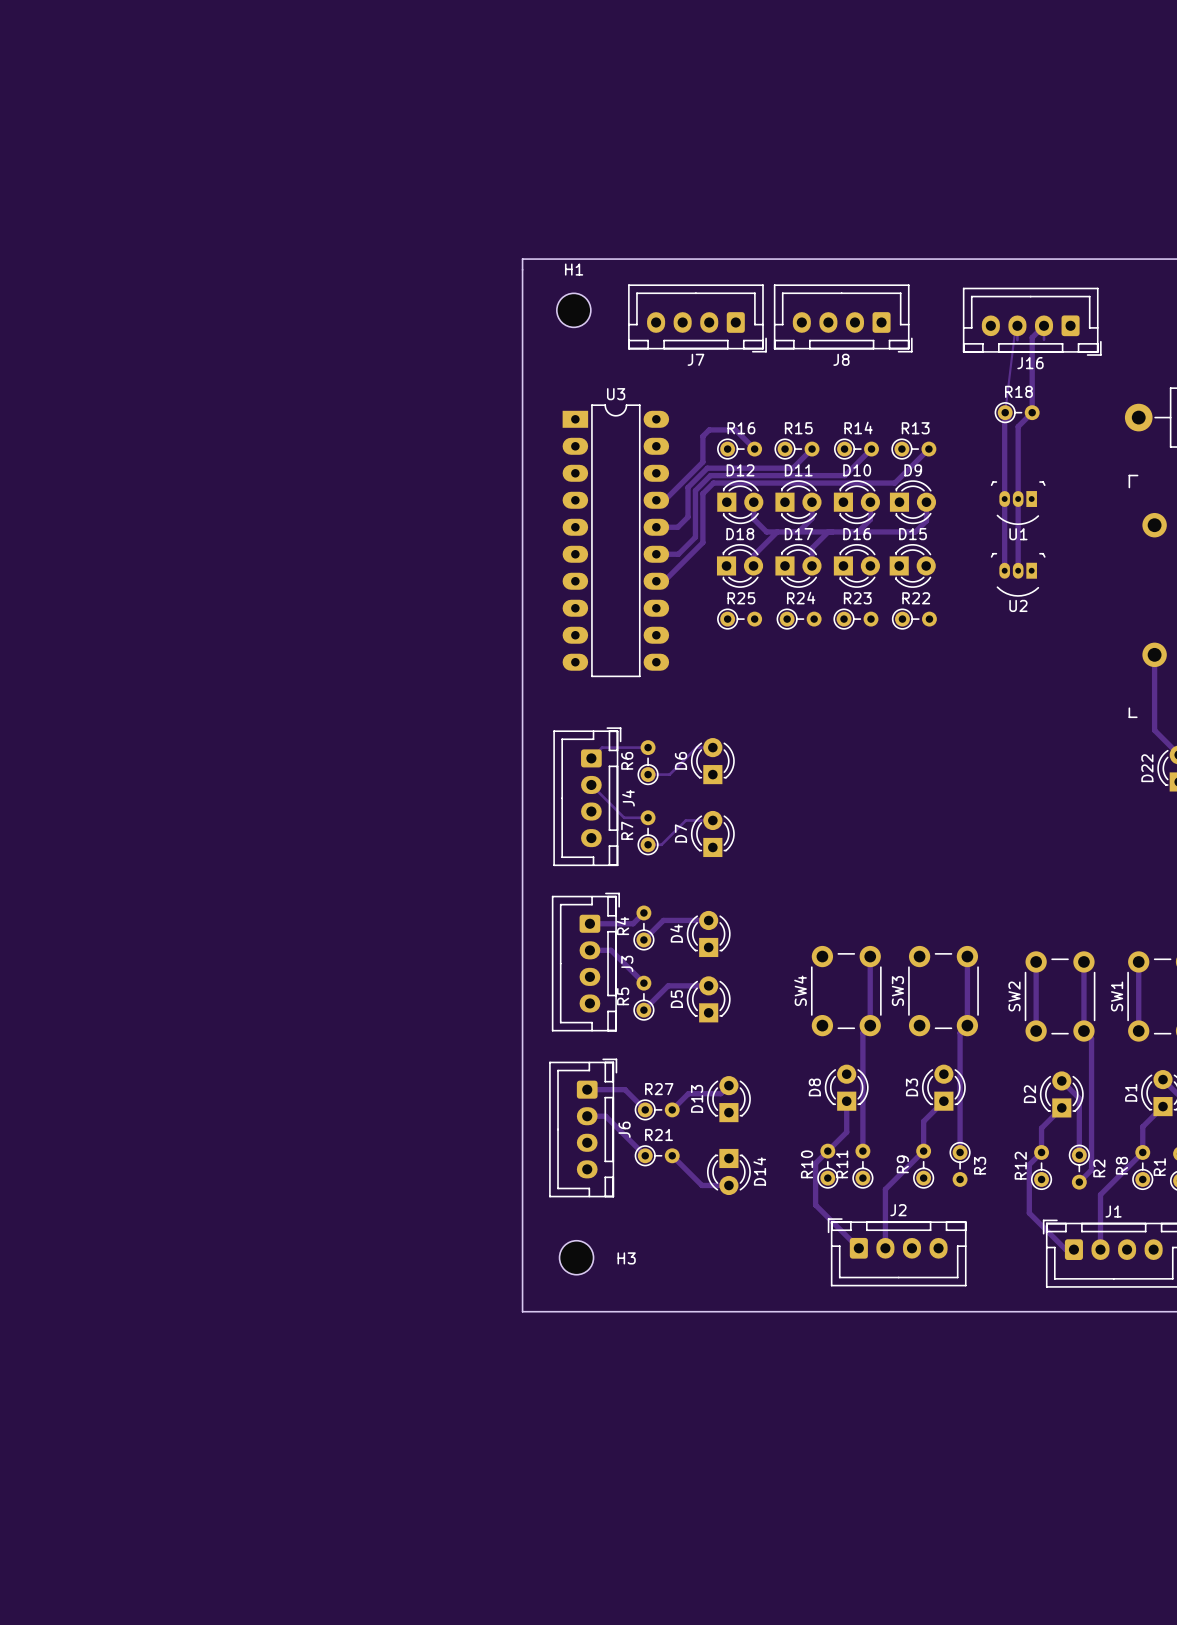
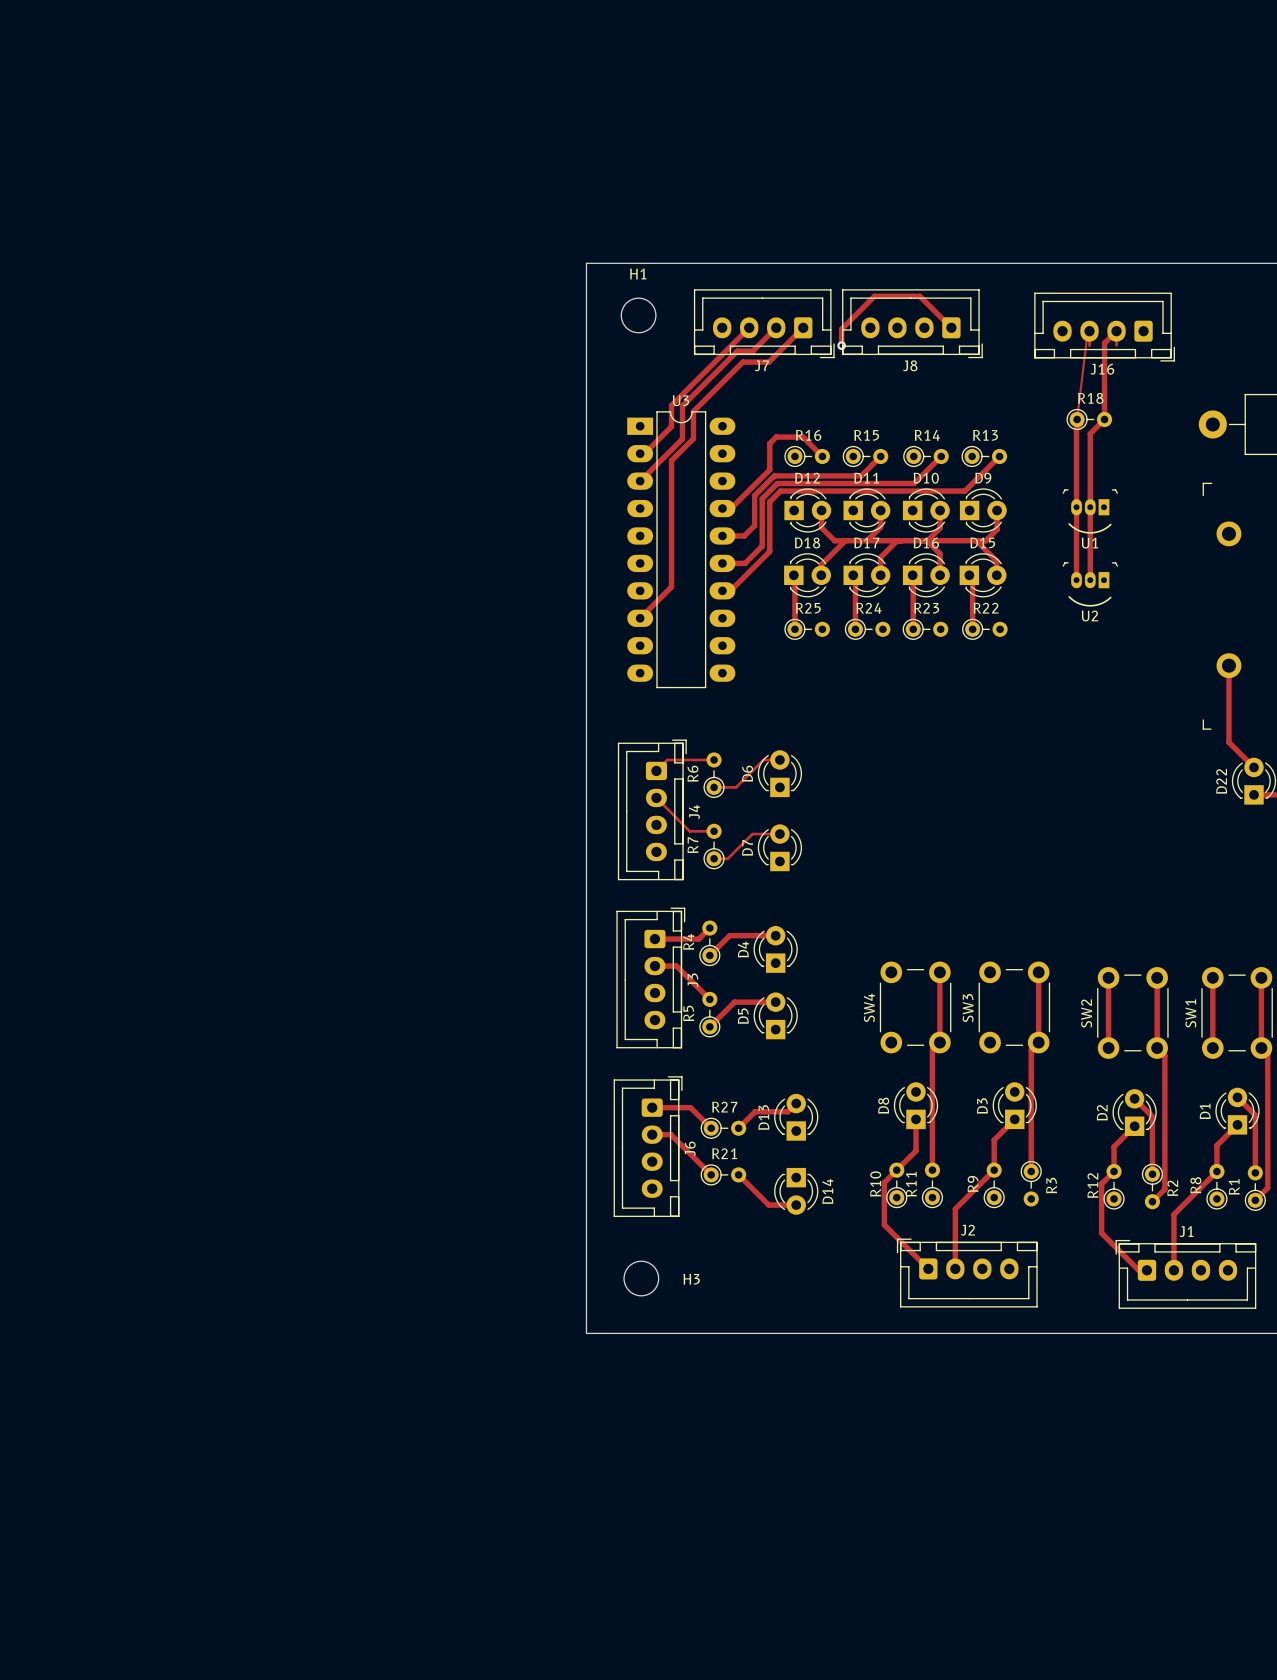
track: none -> (749, 327) (671, 405) (671, 426) (644, 453) (640, 453)
track: none -> (776, 327) (752, 351) (737, 351) (682, 406) (682, 438) (640, 481)
track: none -> (803, 327) (768, 362) (742, 362) (693, 411) (693, 438) (671, 460) (671, 586) (640, 618)
track: none -> (951, 327) (919, 296) (874, 296) (841, 329) (841, 345)
via: none -> (841, 345)
track: none -> (926, 540) (940, 553) (940, 575)
track: none -> (976, 540) (996, 561) (996, 575)
track: none -> (793, 575) (794, 629)
track: none -> (853, 575) (855, 577) (855, 629)
track: none -> (912, 575) (913, 629)
track: none -> (969, 575) (972, 578) (972, 629)

